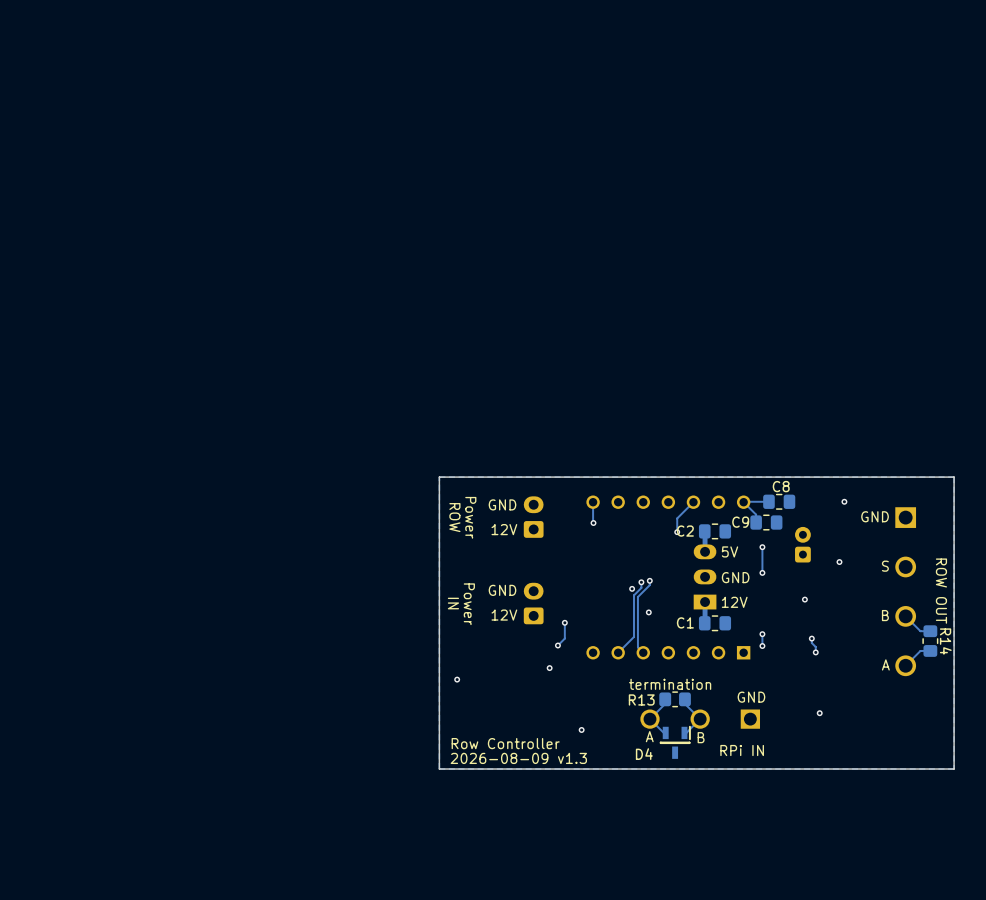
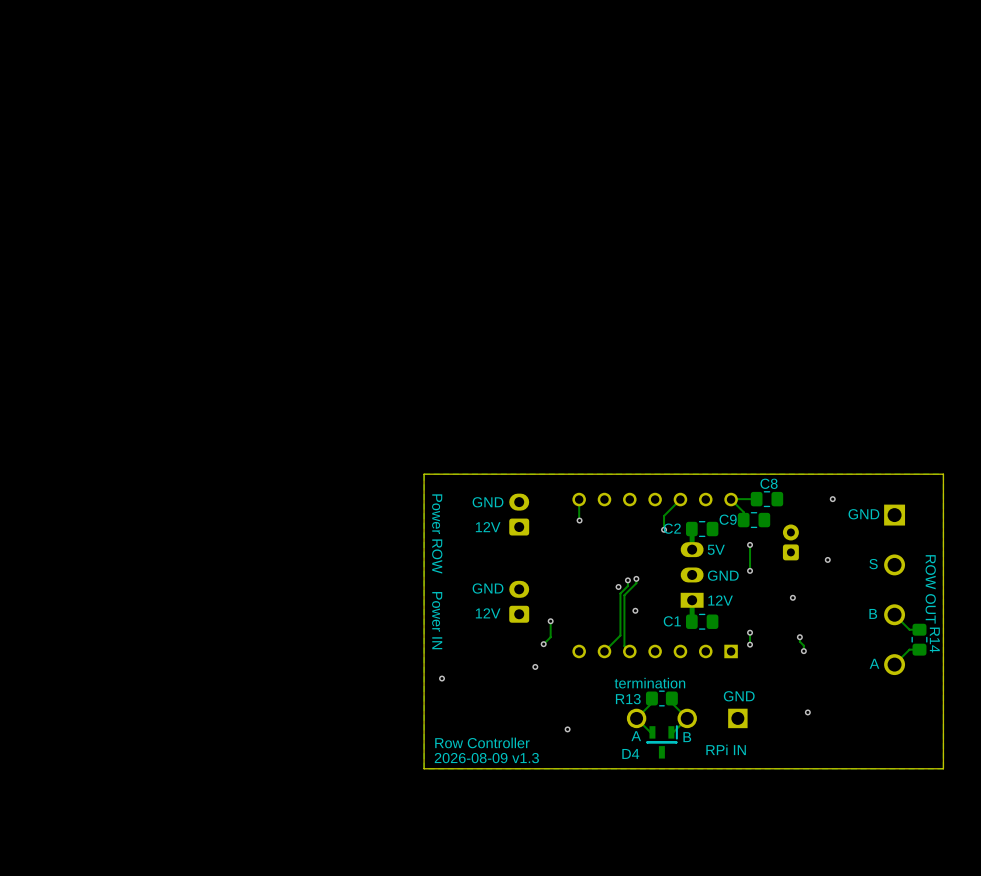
text: ROW (454, 517) -> none
text: Power (470, 517) -> Power ROW (437, 533)
text: IN (453, 603) -> none
text: Power (469, 604) -> Power IN (437, 620)

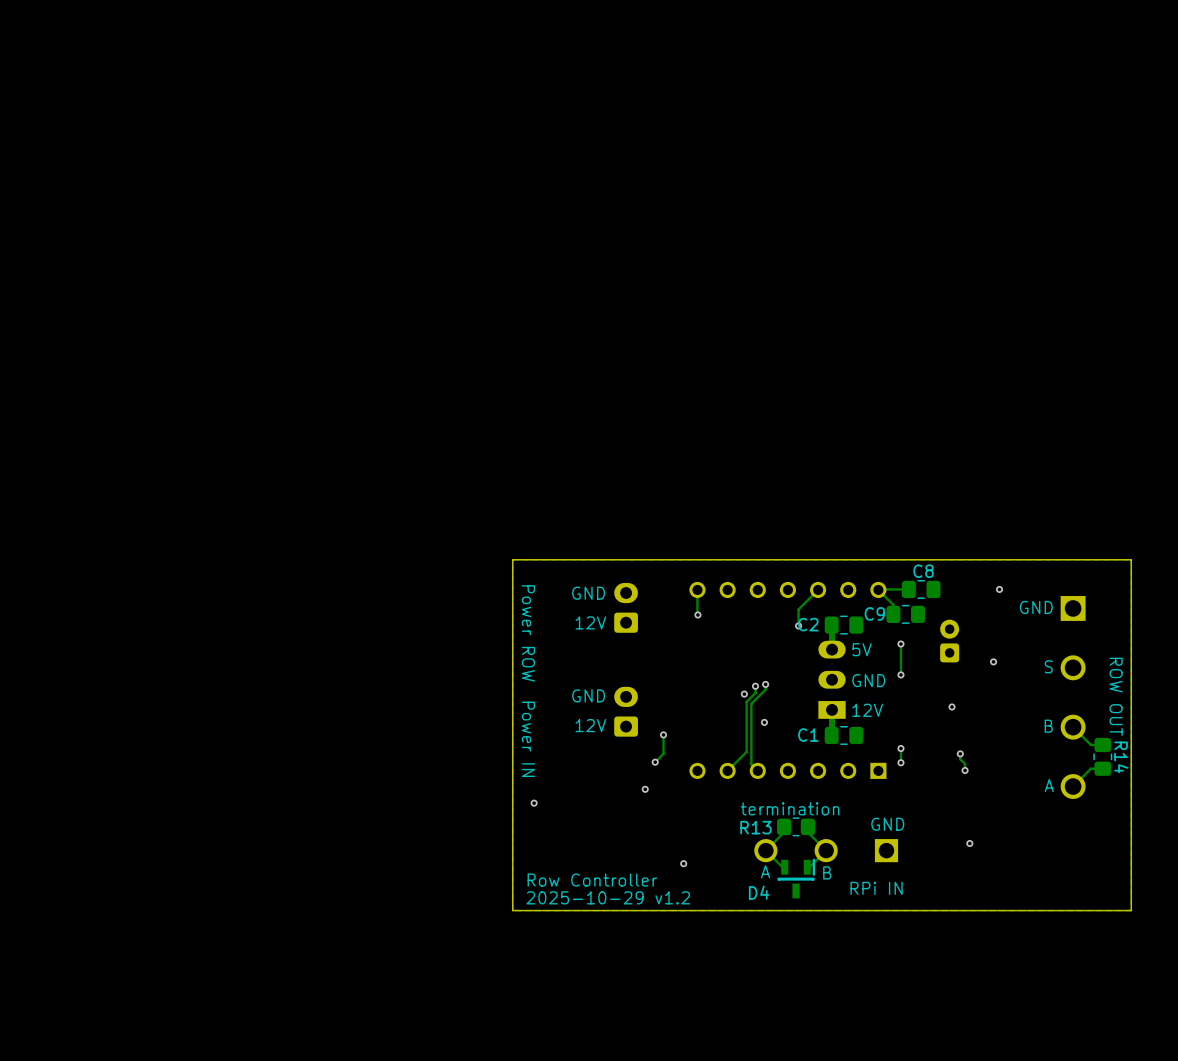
text: 2026-08-09 v1.3 (486, 758) -> 2025-10-29 v1.2 (608, 897)

